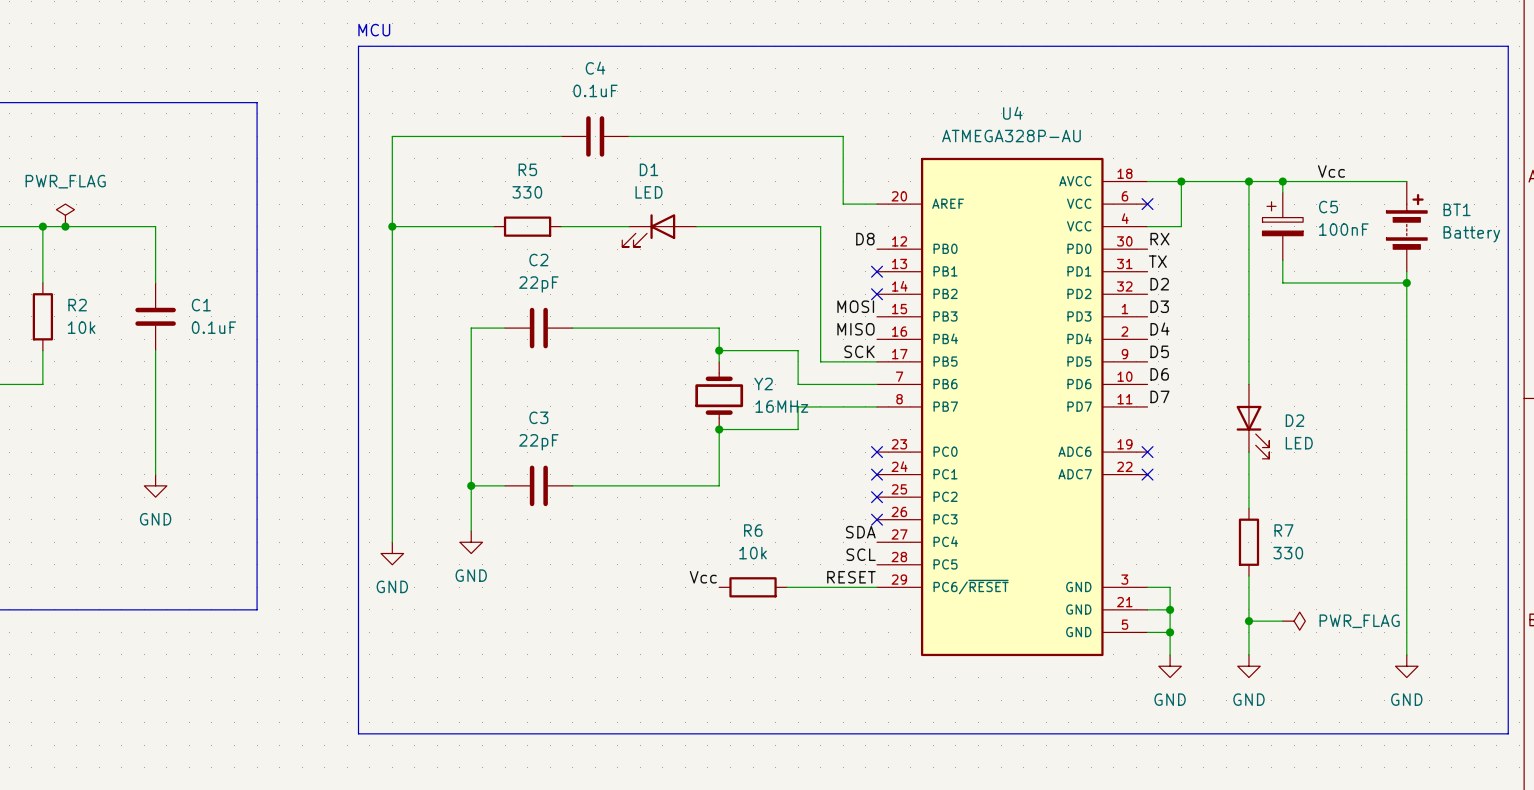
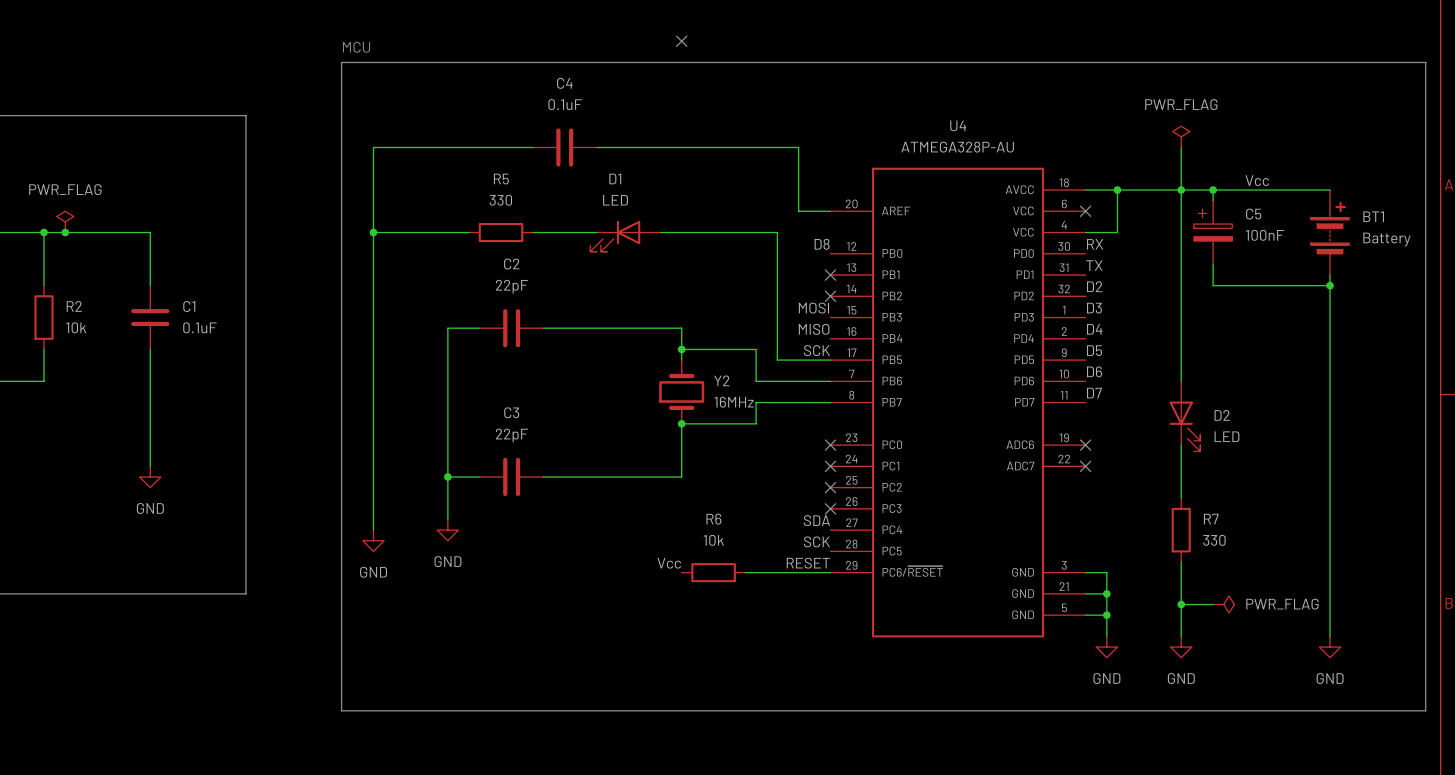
no-connect mark: none -> (681, 41)
power symbol: none -> PWR_FLAG (1181, 136)
wire: none -> (1181, 147) (1181, 190)
label: SCL (861, 554) -> SCK (817, 541)

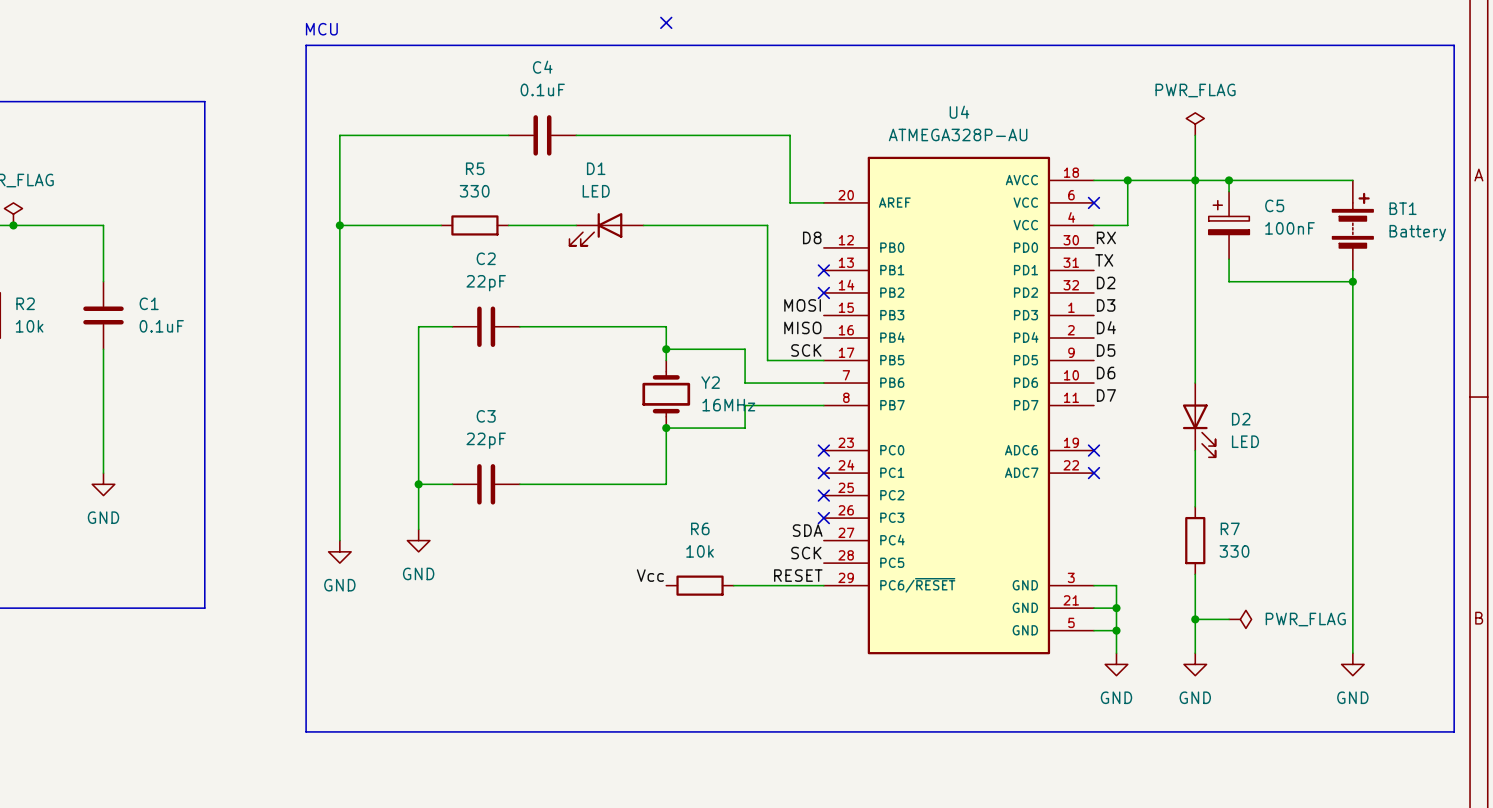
label: Vcc (1257, 180) -> none

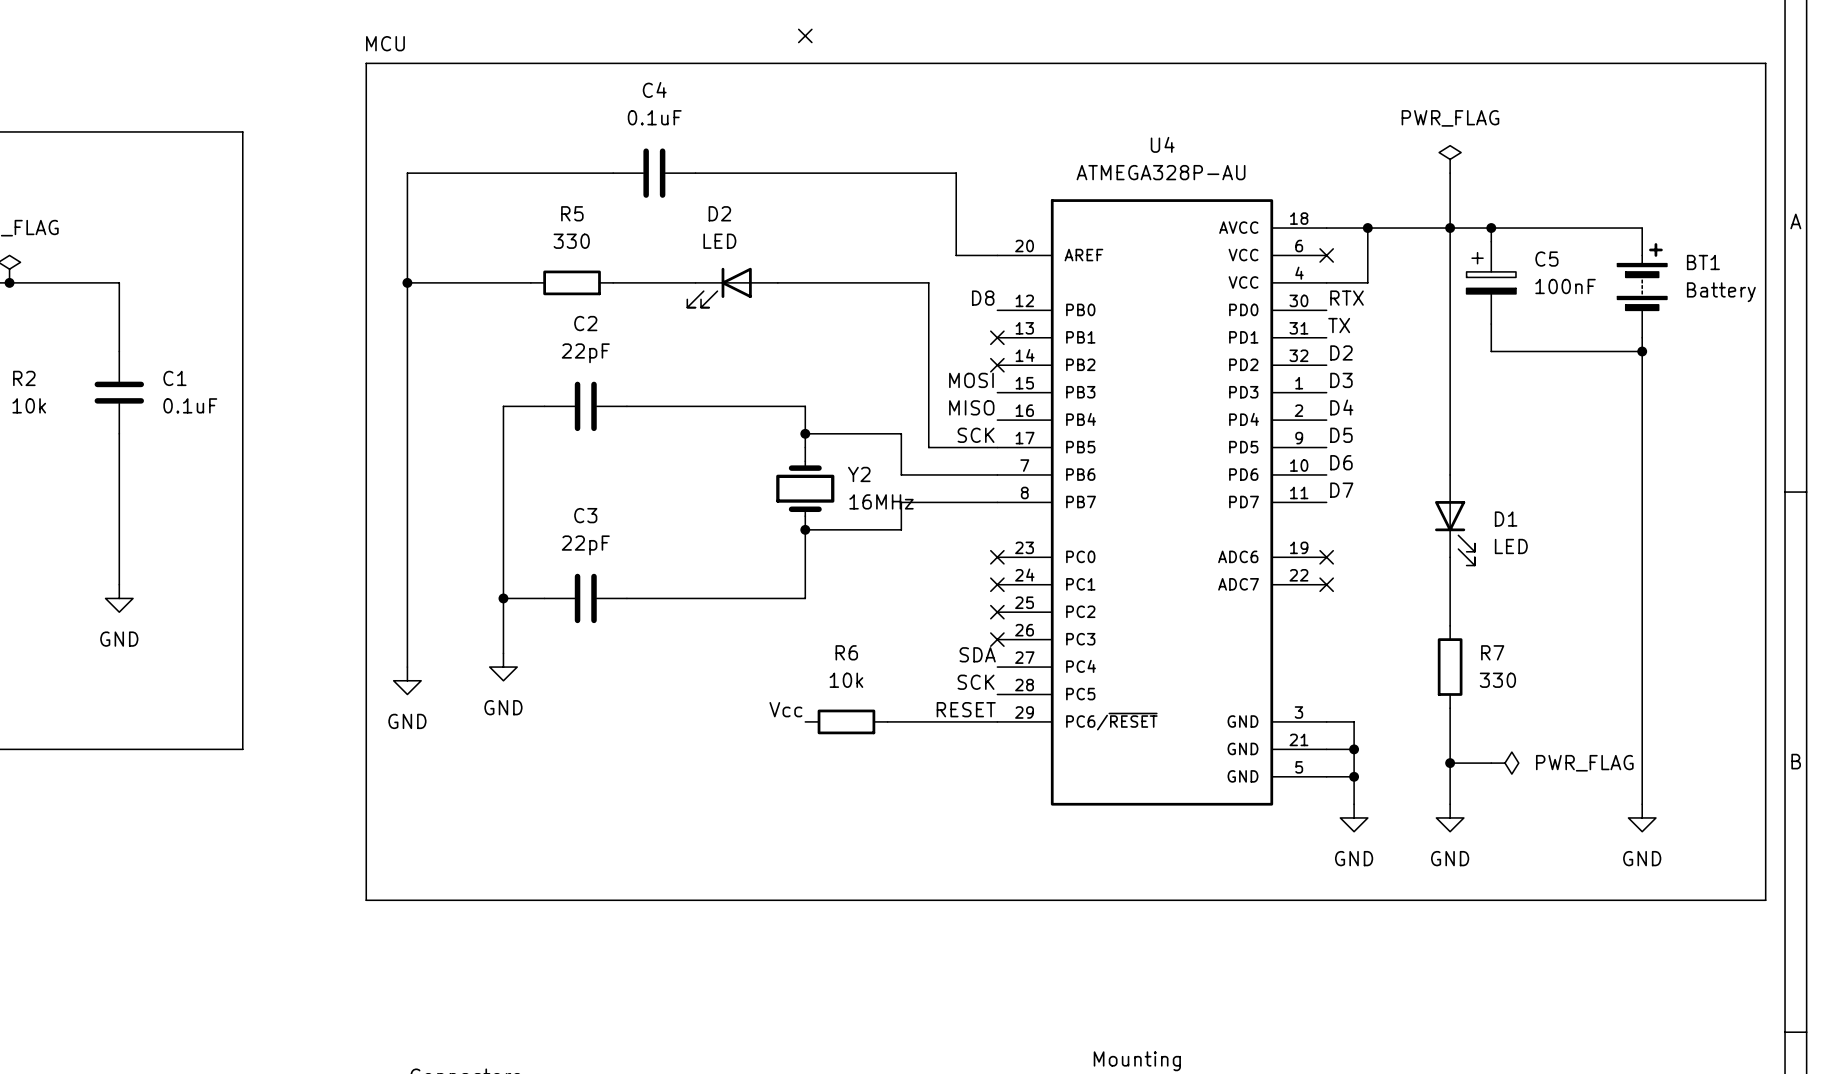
D1 name: D1 (596, 168) -> D2 (719, 213)
label: RX (1106, 237) -> RTX (1347, 298)
D2 name: D2 (1241, 419) -> D1 (1506, 519)

